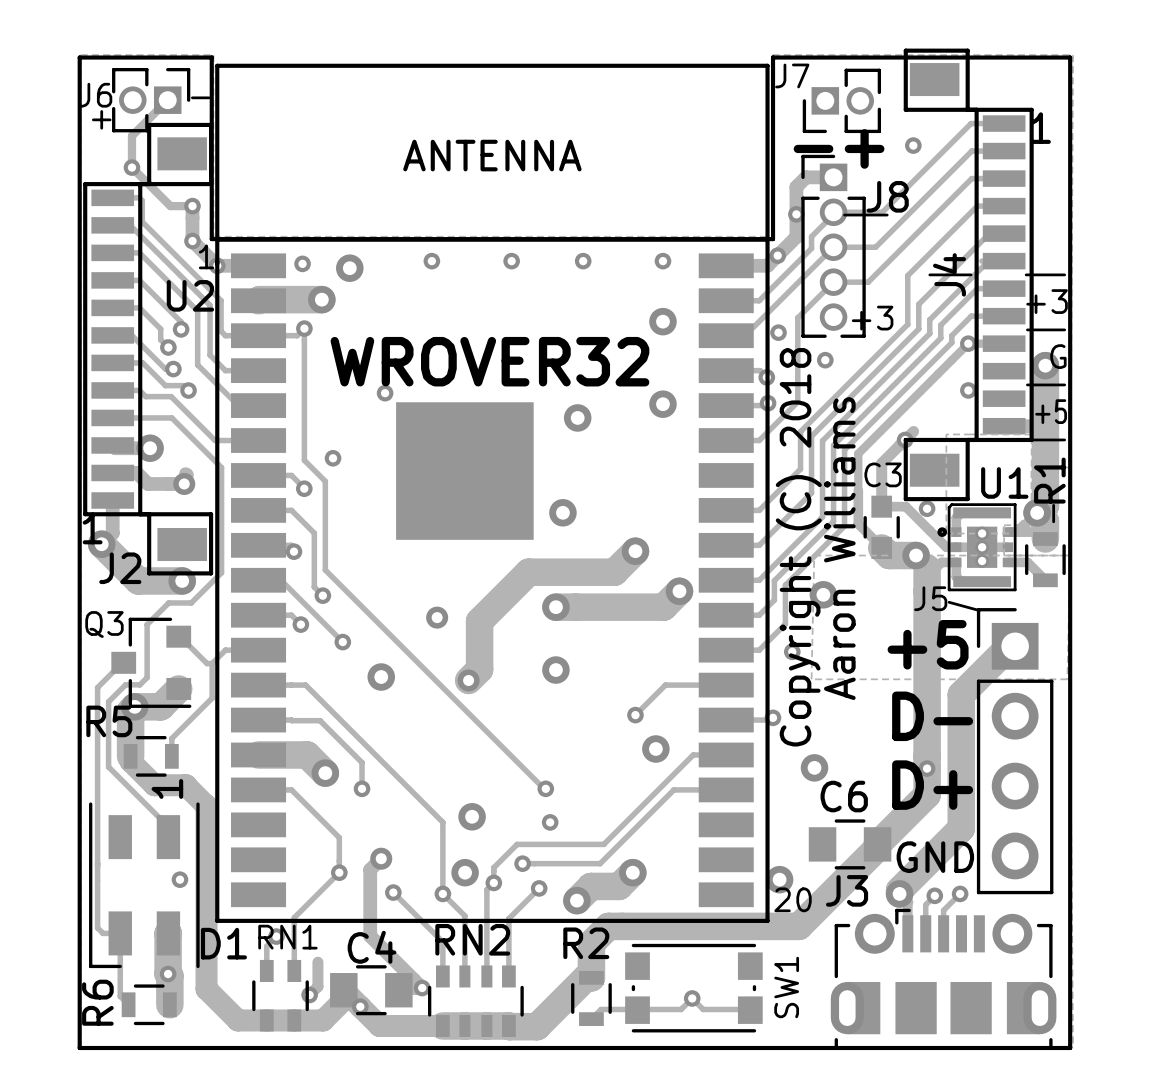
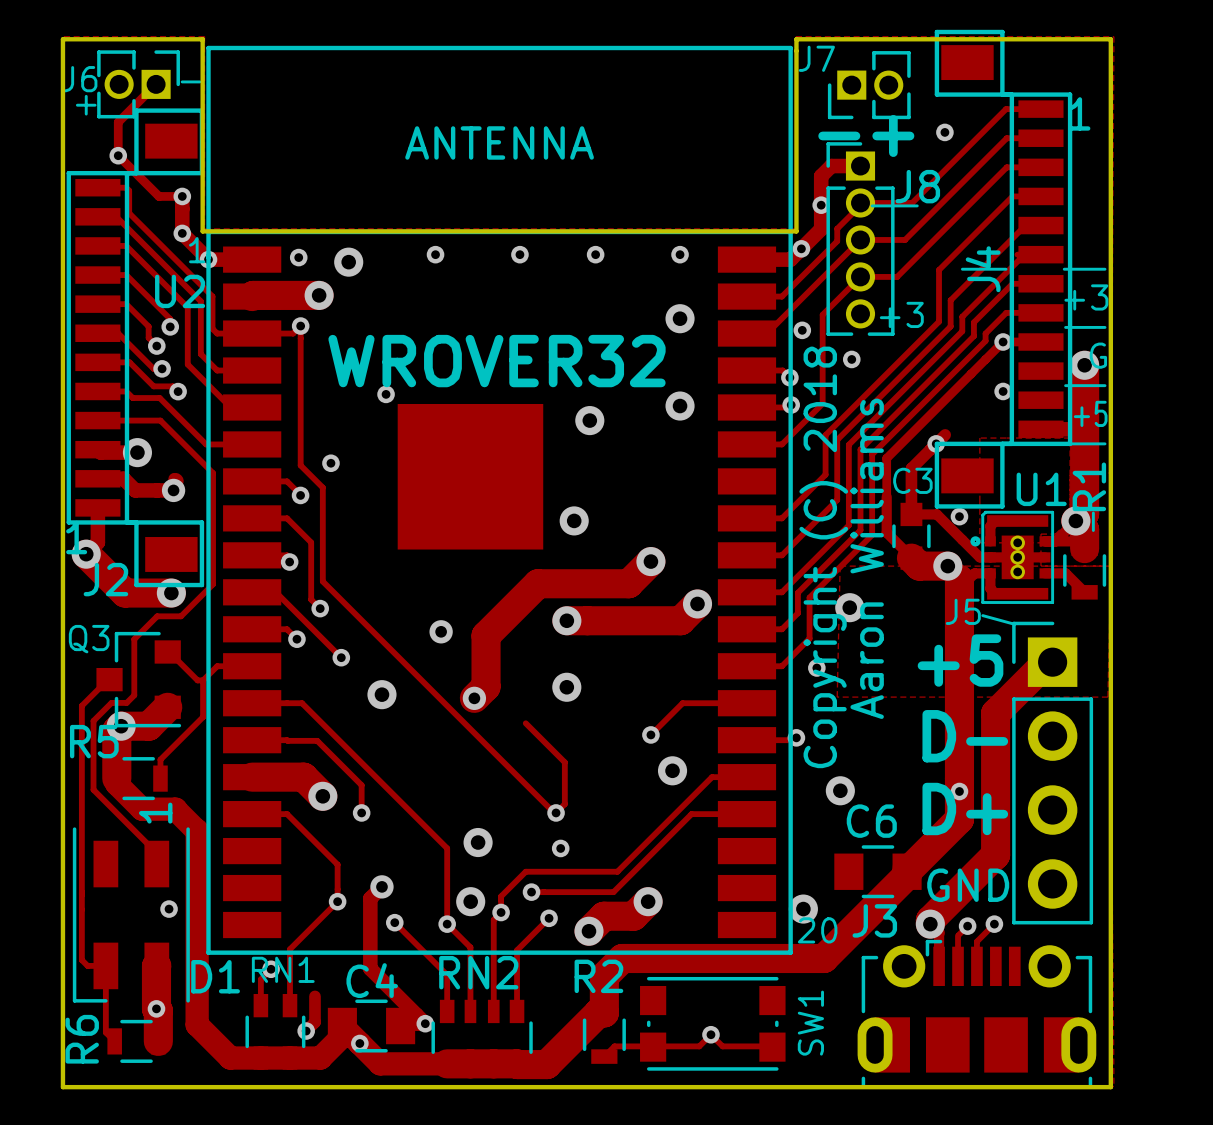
track: none -> (525, 723) (564, 762) (564, 804) (556, 812)

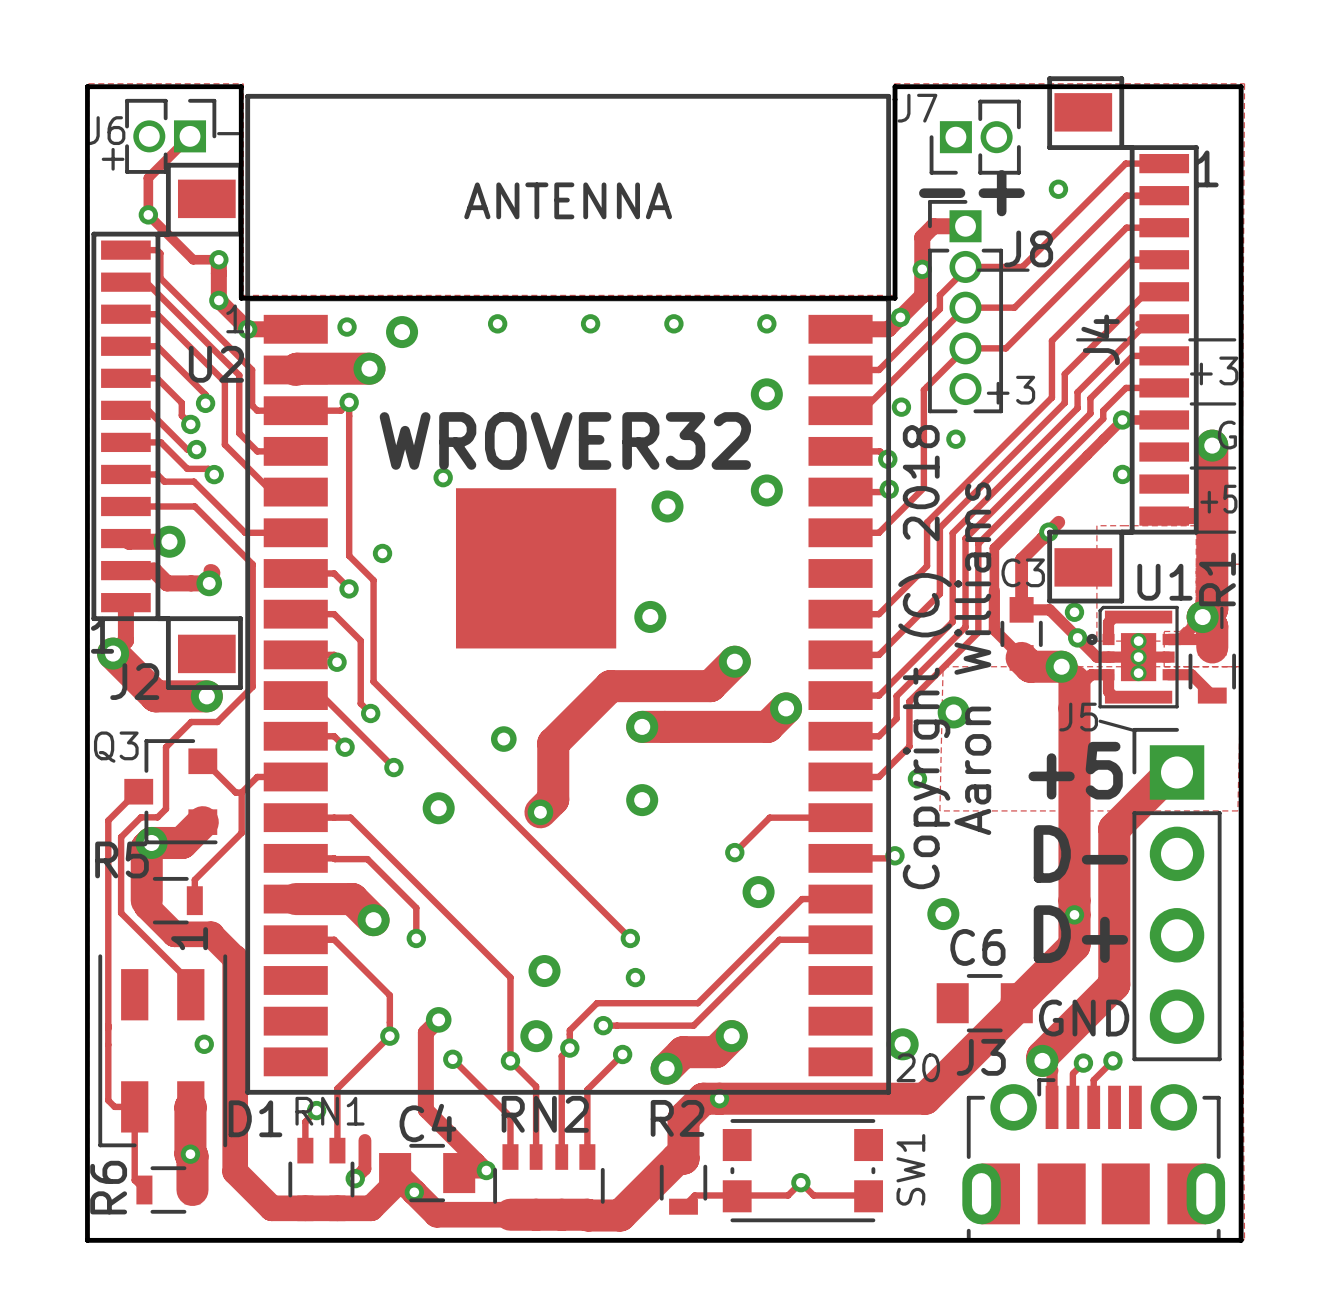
via: none -> (1077, 637)
track: (322, 579) (556, 812) (564, 804) (564, 762) (525, 723) -> (373, 681) (630, 938)
via: none -> (719, 1098)

